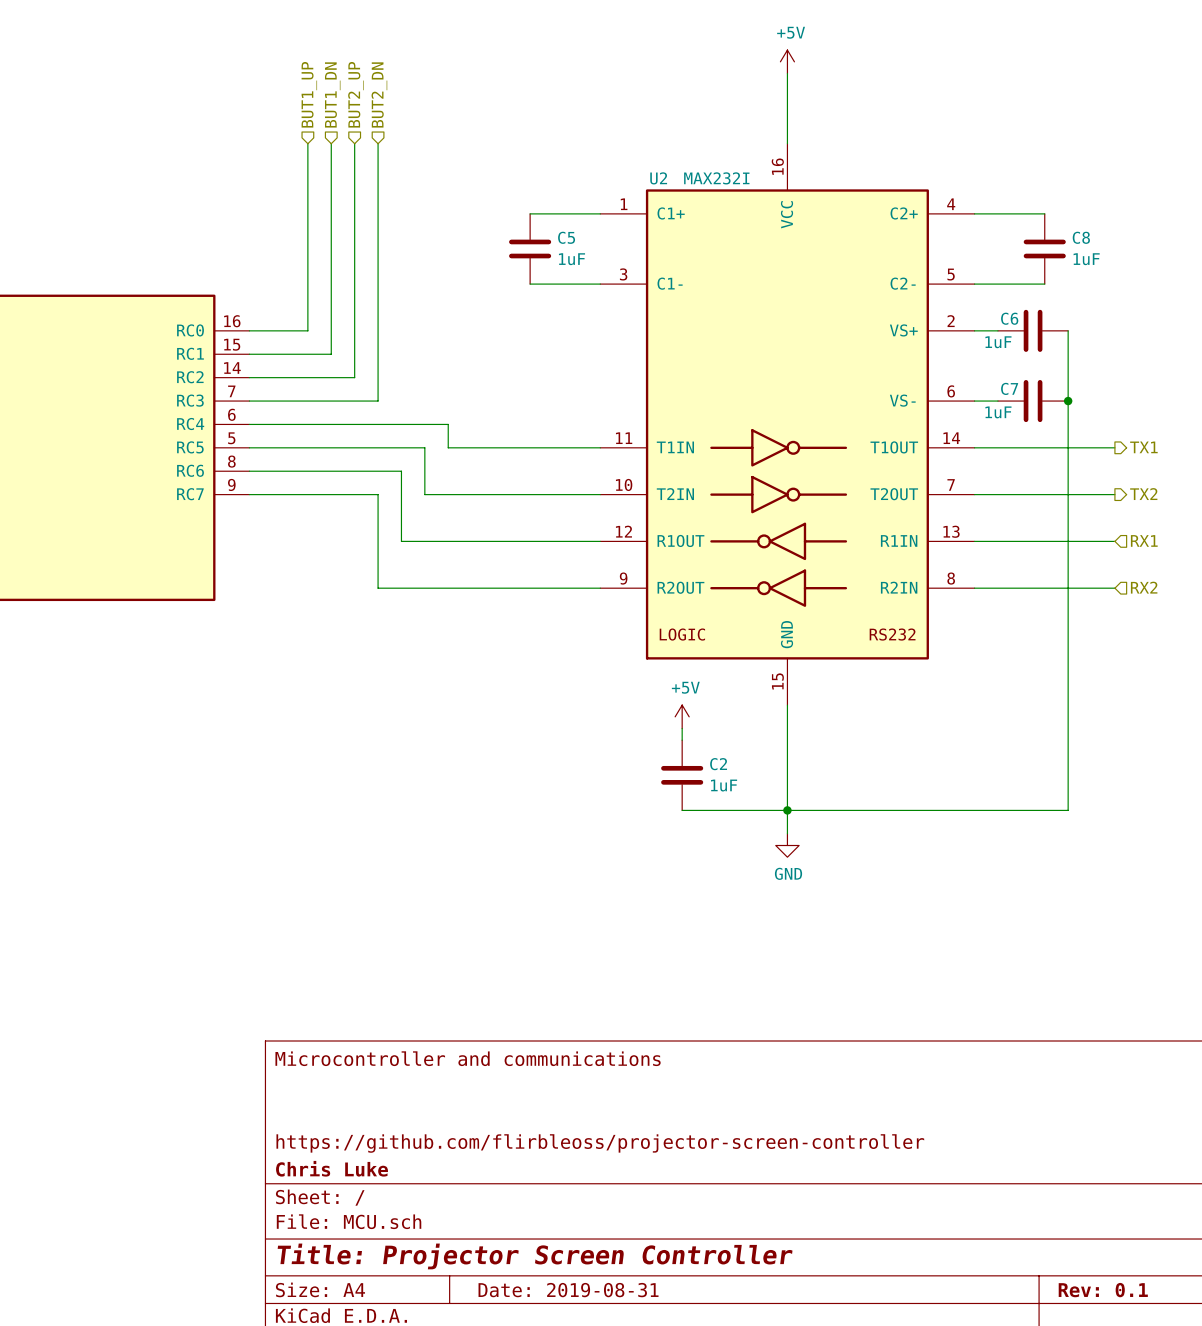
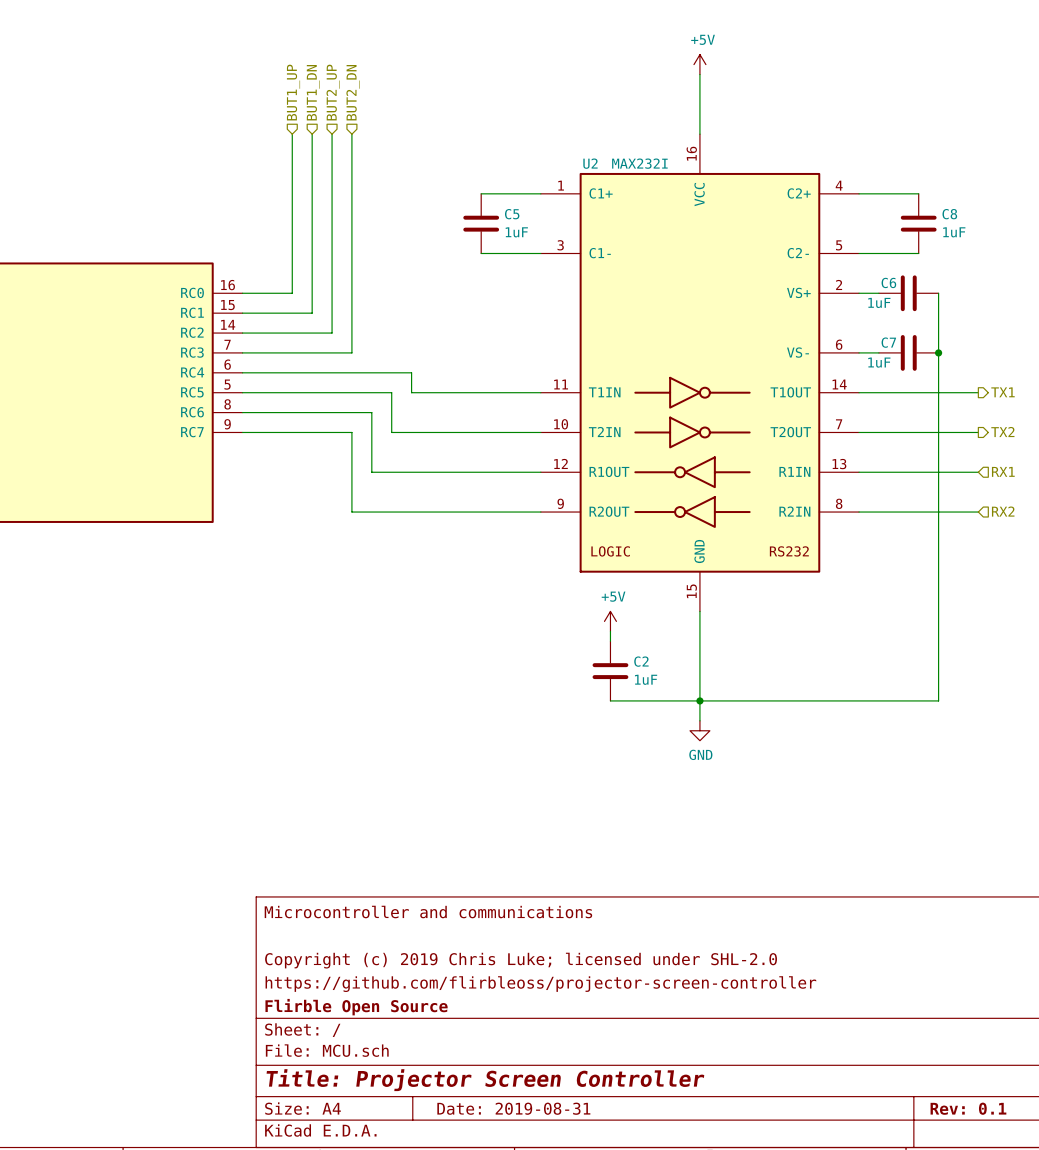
title block: none -> Copyright (c) 2019 Chris Luke; licensed under SHL-2.0 (521, 960)
title block: Chris Luke (332, 1168) -> Flirble Open Source (356, 1007)

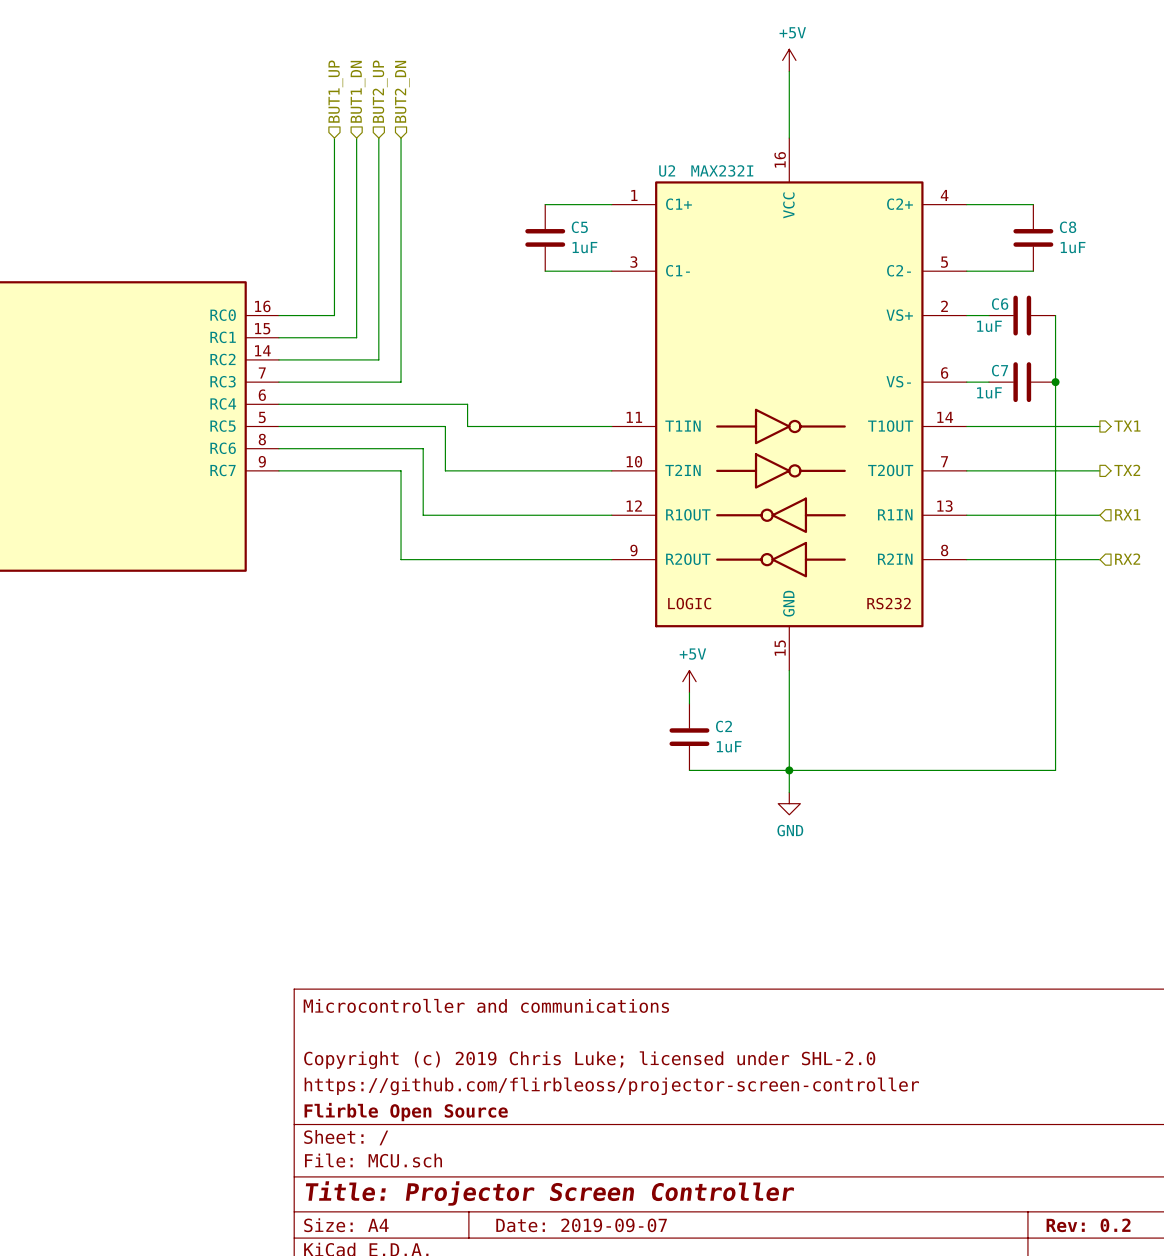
title block: Date: 2019-08-31 (513, 1108) -> Date: 2019-09-07 (581, 1225)
title block: Rev: 0.1 (968, 1108) -> Rev: 0.2 (1088, 1225)

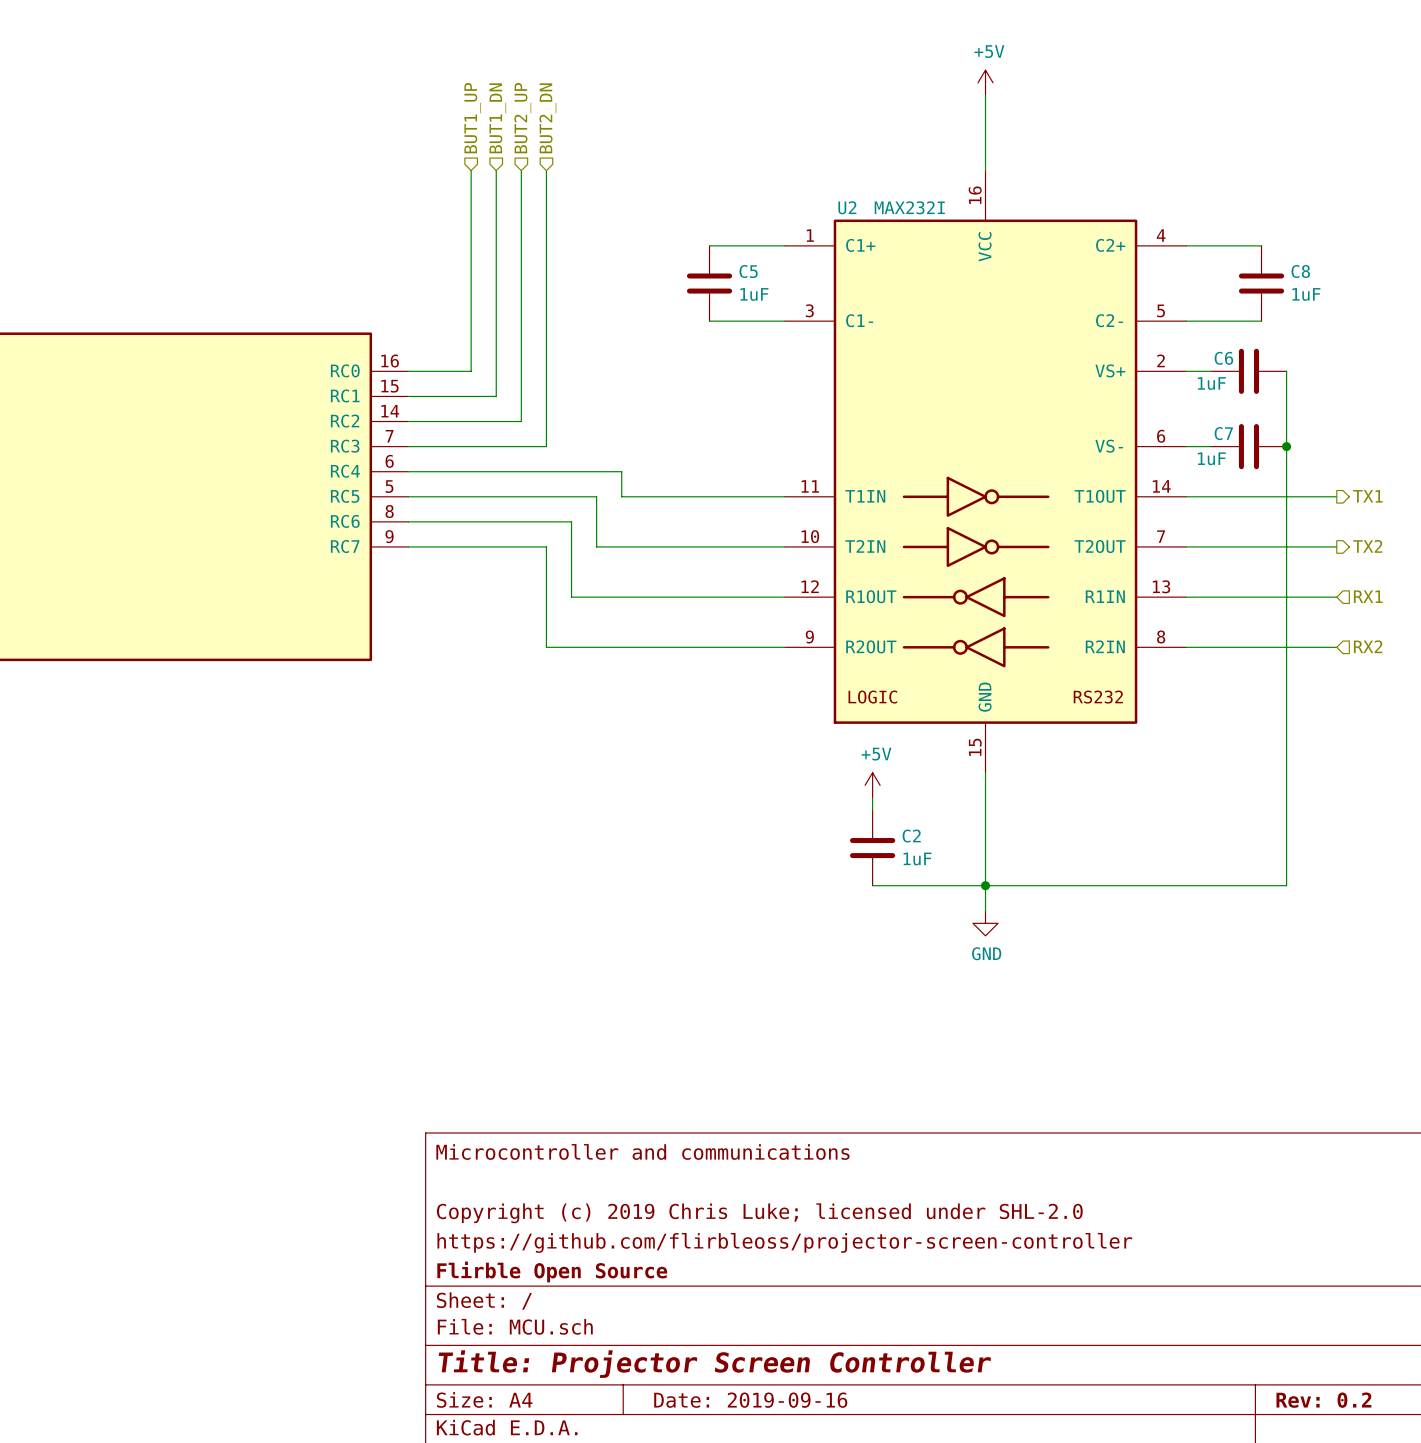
title block: Date: 2019-09-07 (581, 1225) -> Date: 2019-09-16 (750, 1400)

